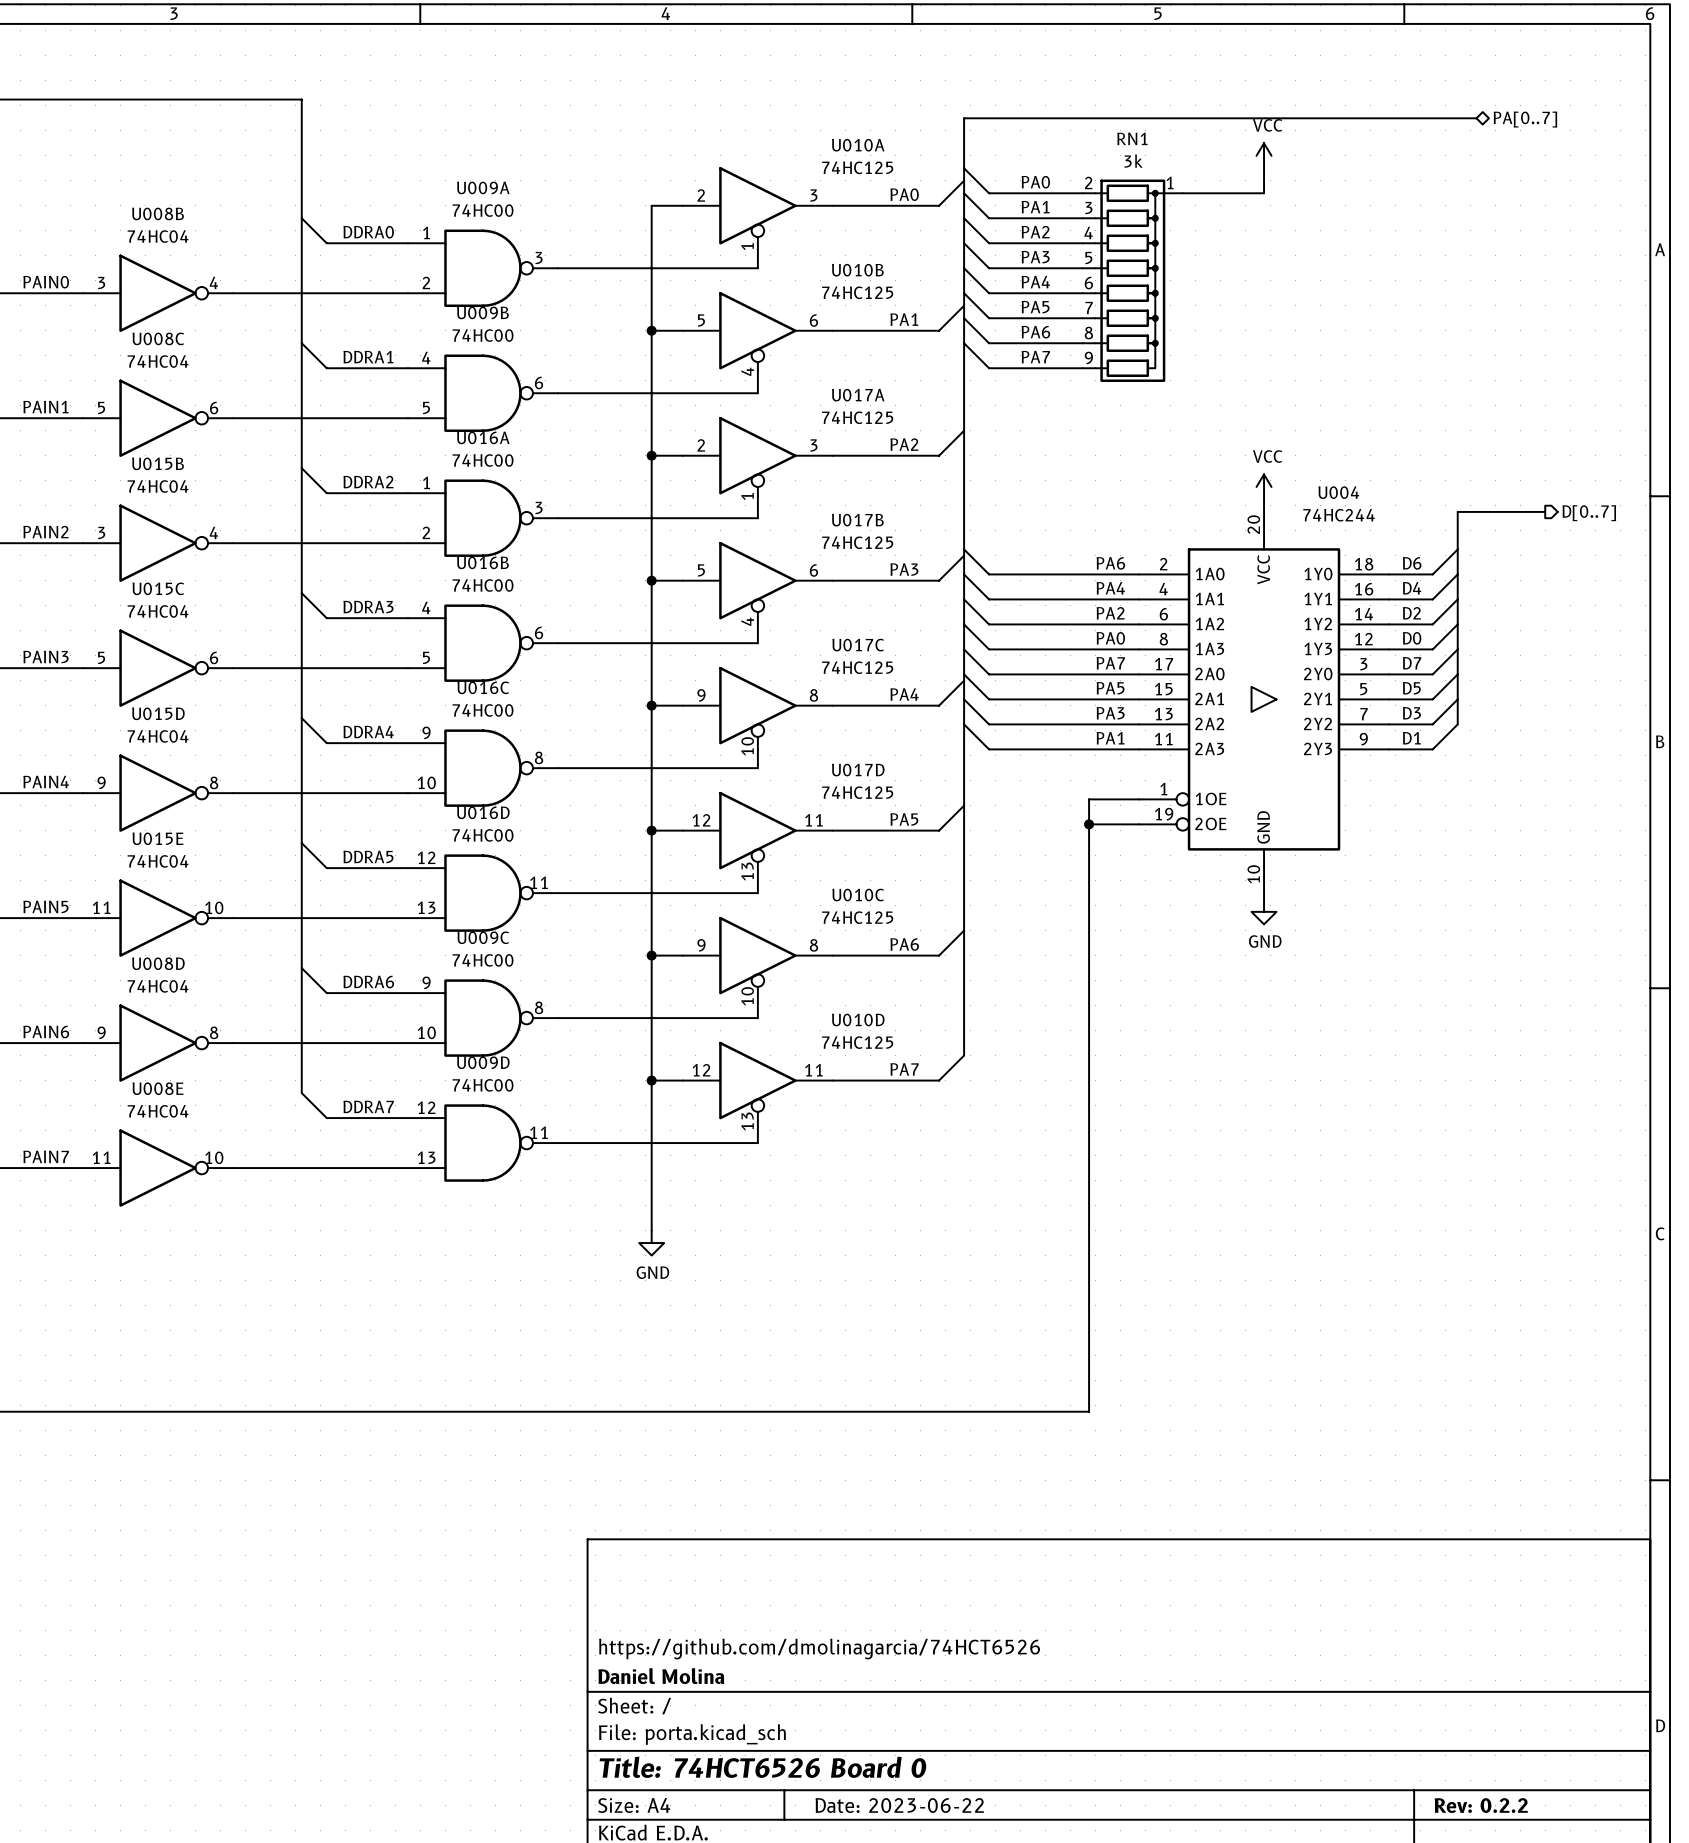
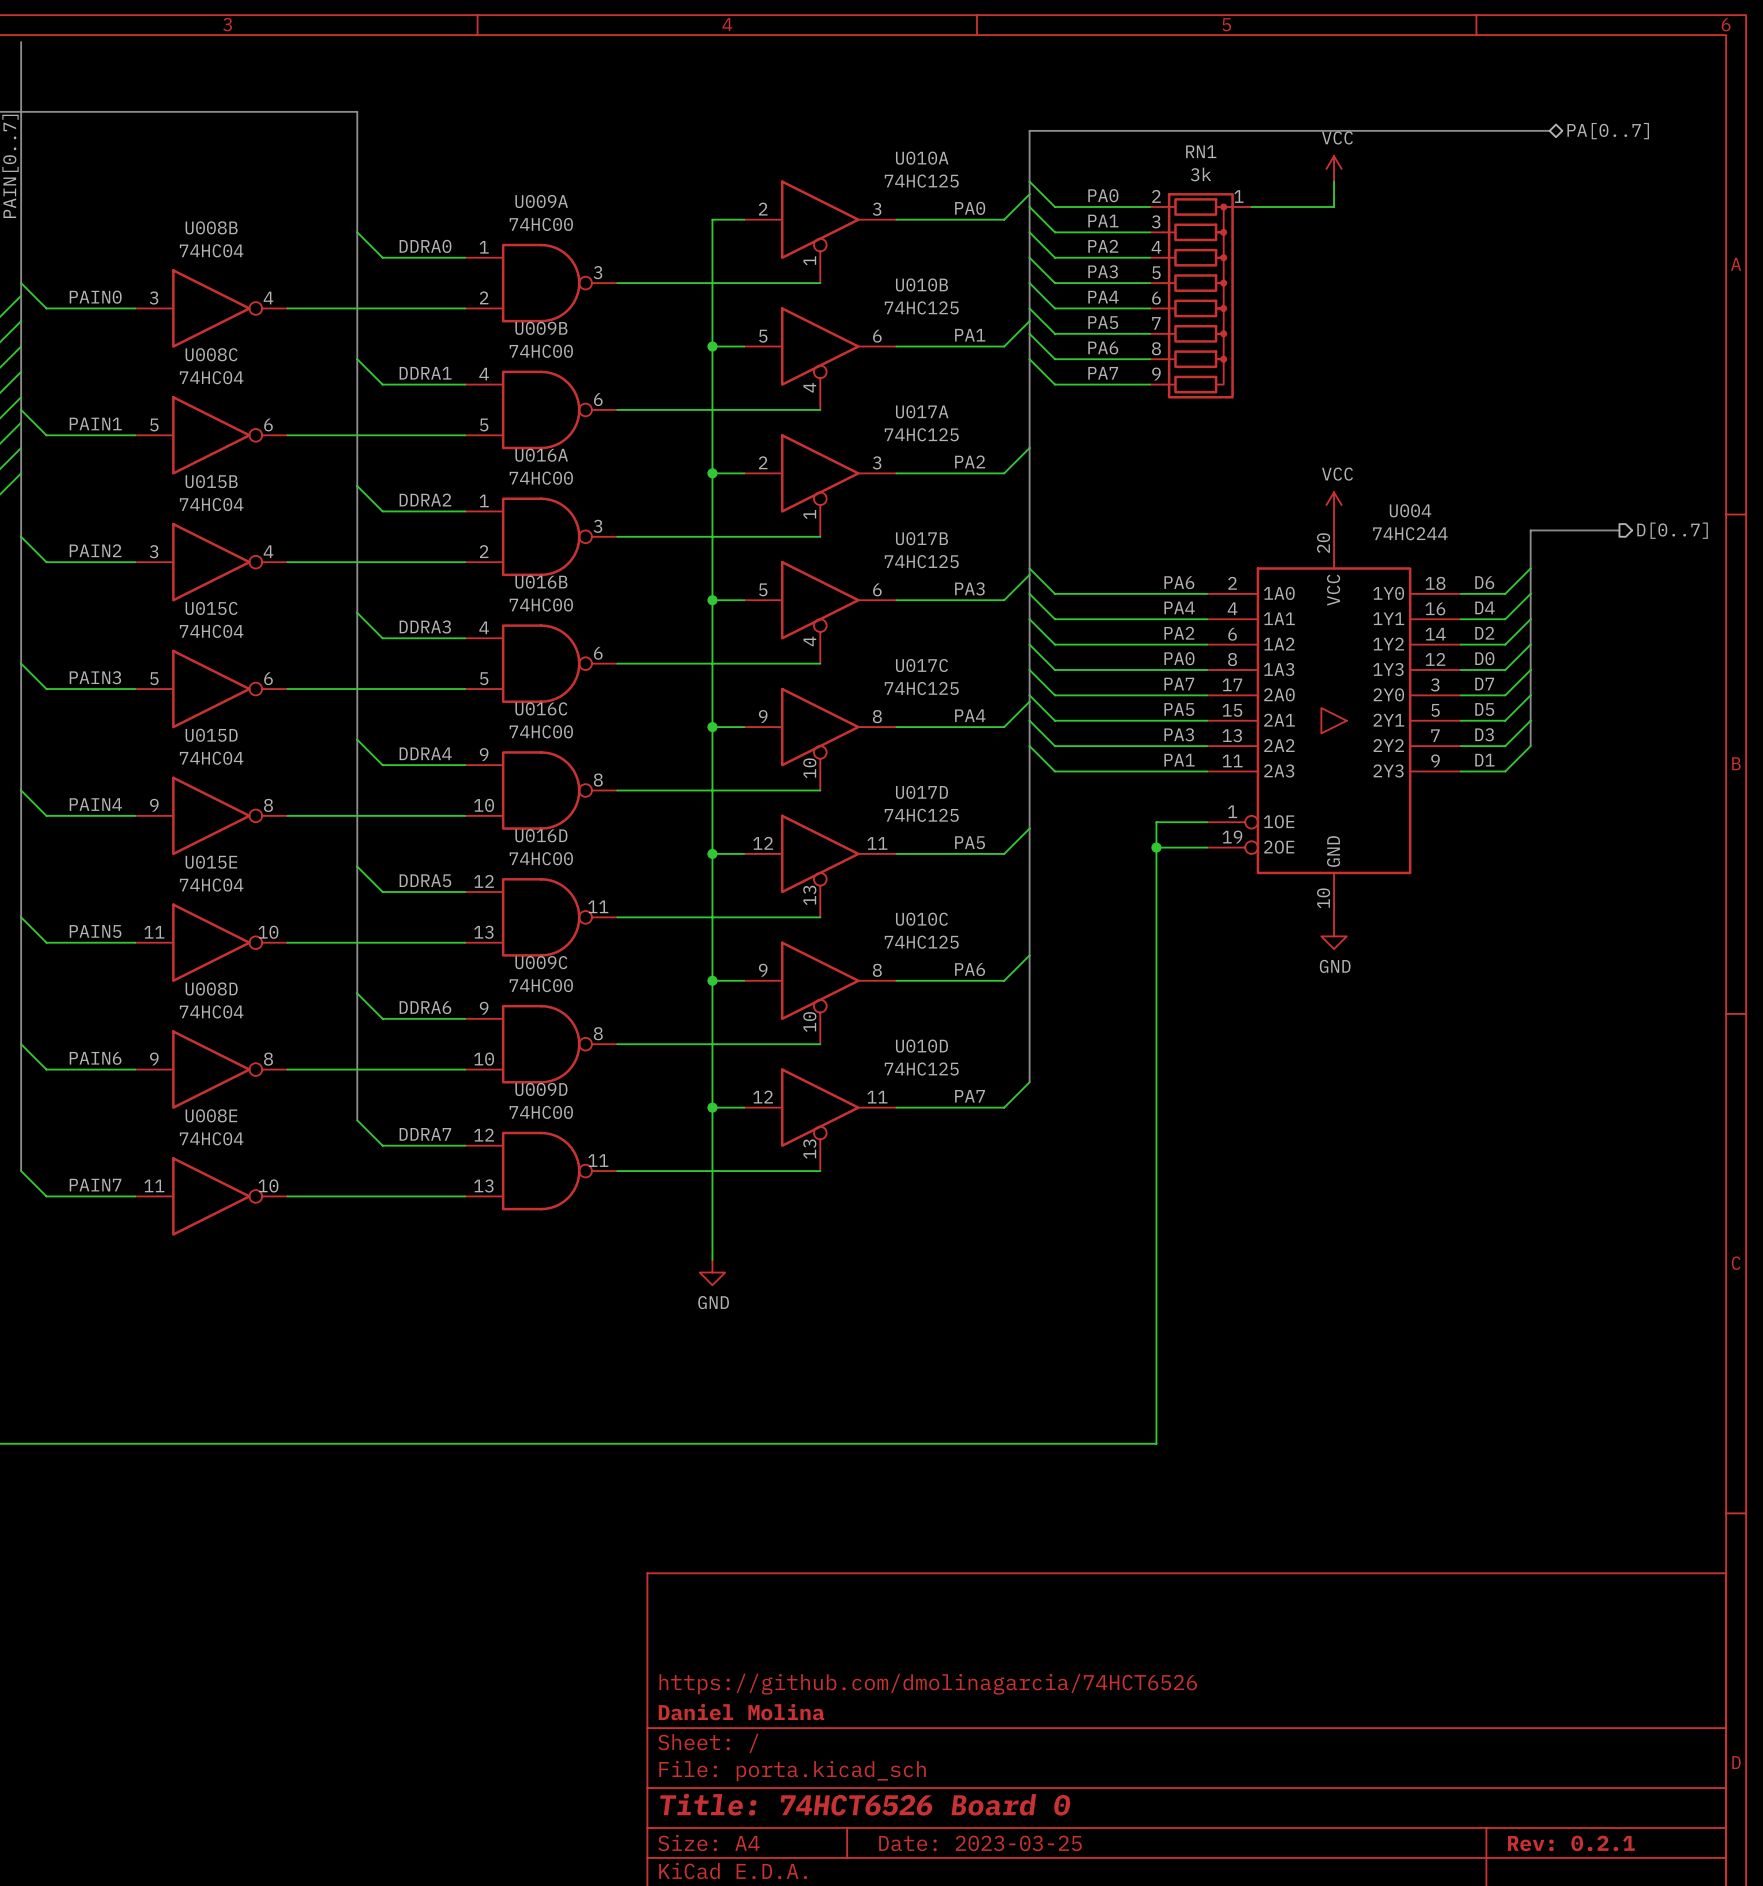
title block: Date: 2023-06-22 (899, 1805) -> Date: 2023-03-25 (980, 1843)
title block: Rev: 0.2.2 (1481, 1805) -> Rev: 0.2.1 (1571, 1843)

